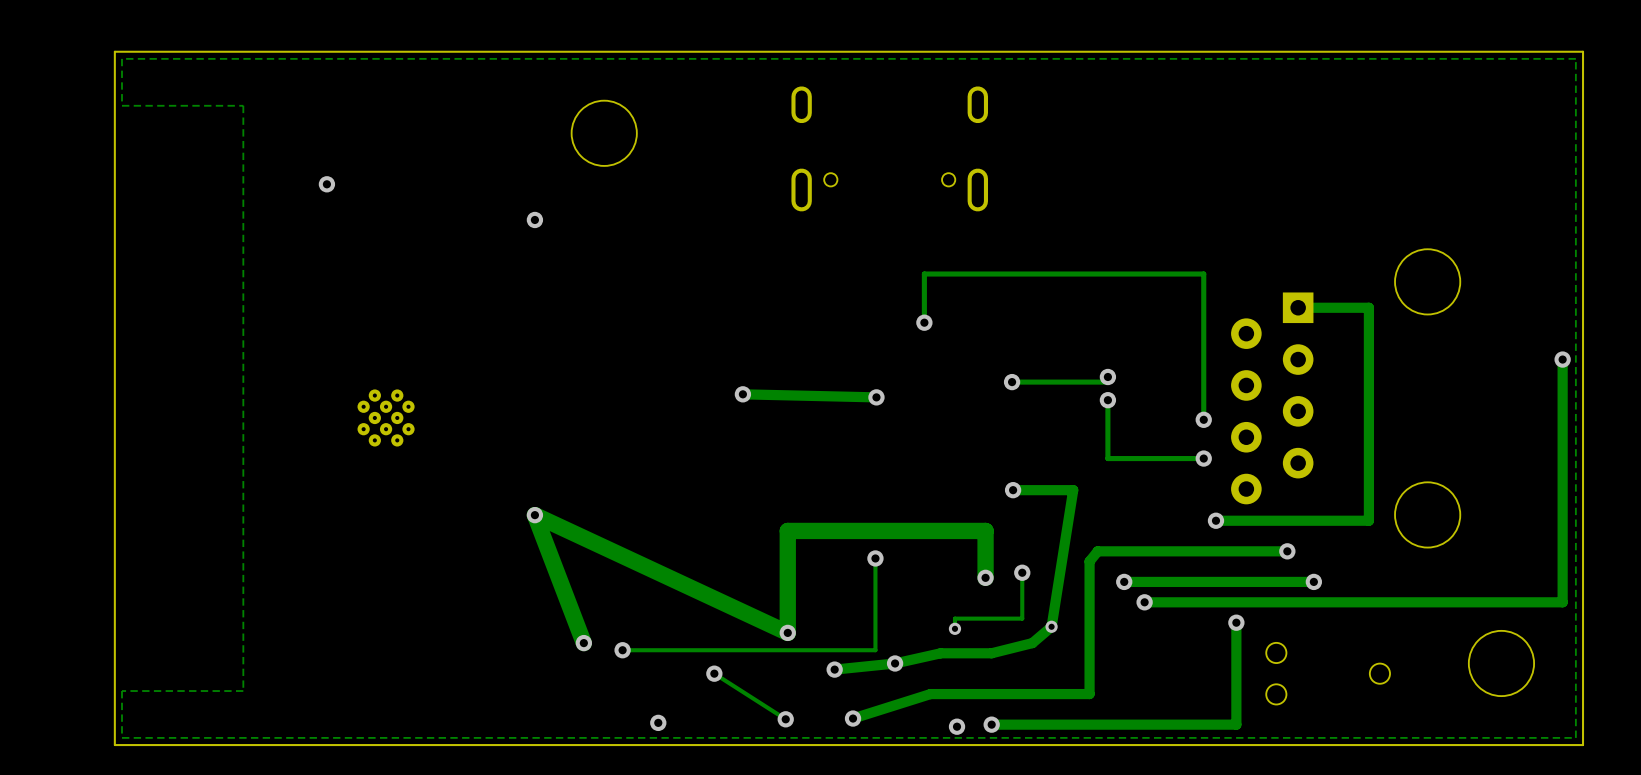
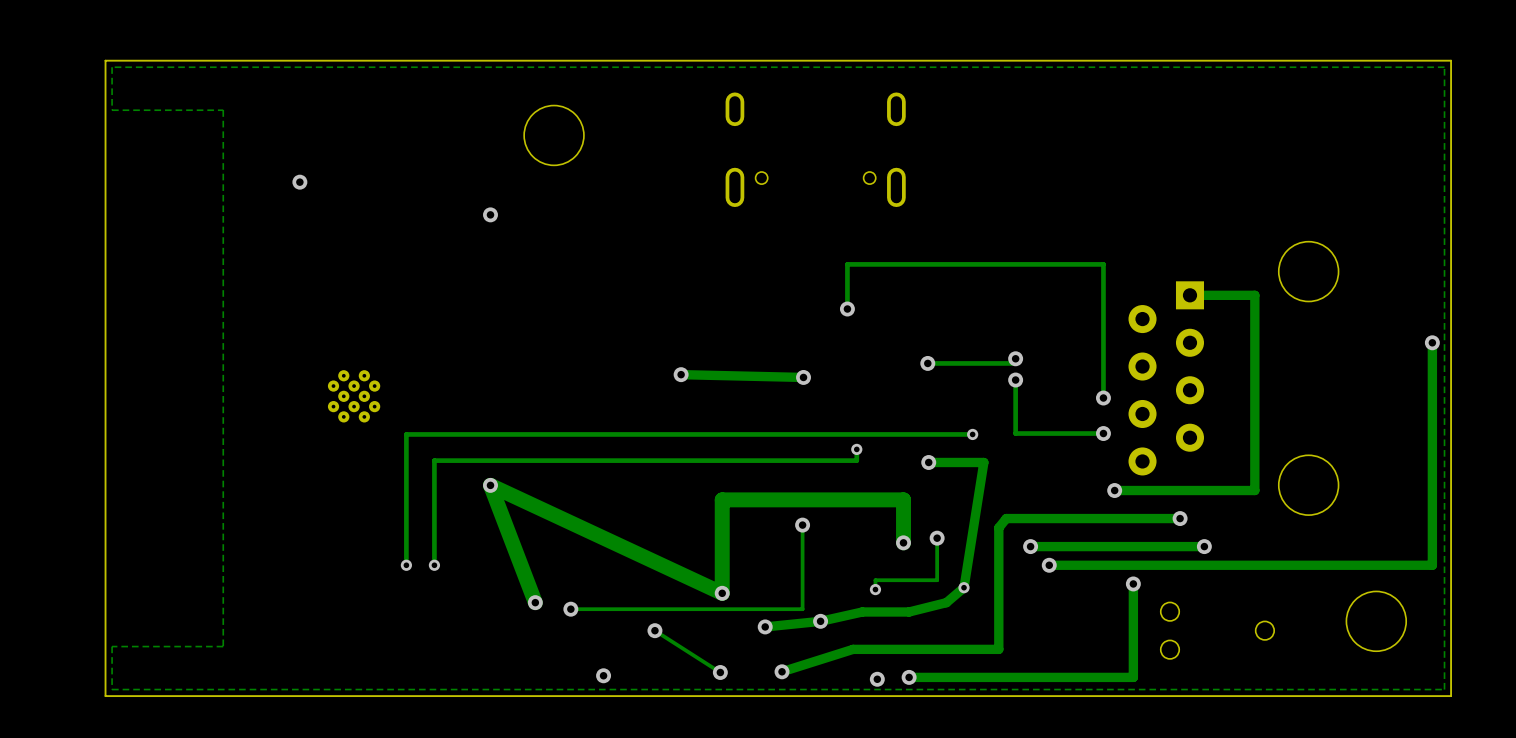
track: none -> (972, 434) (406, 434) (406, 565)
via: none -> (972, 434)
track: none -> (856, 449) (856, 460) (434, 460) (434, 565)
via: none -> (856, 449)
via: none -> (406, 565)
via: none -> (434, 565)

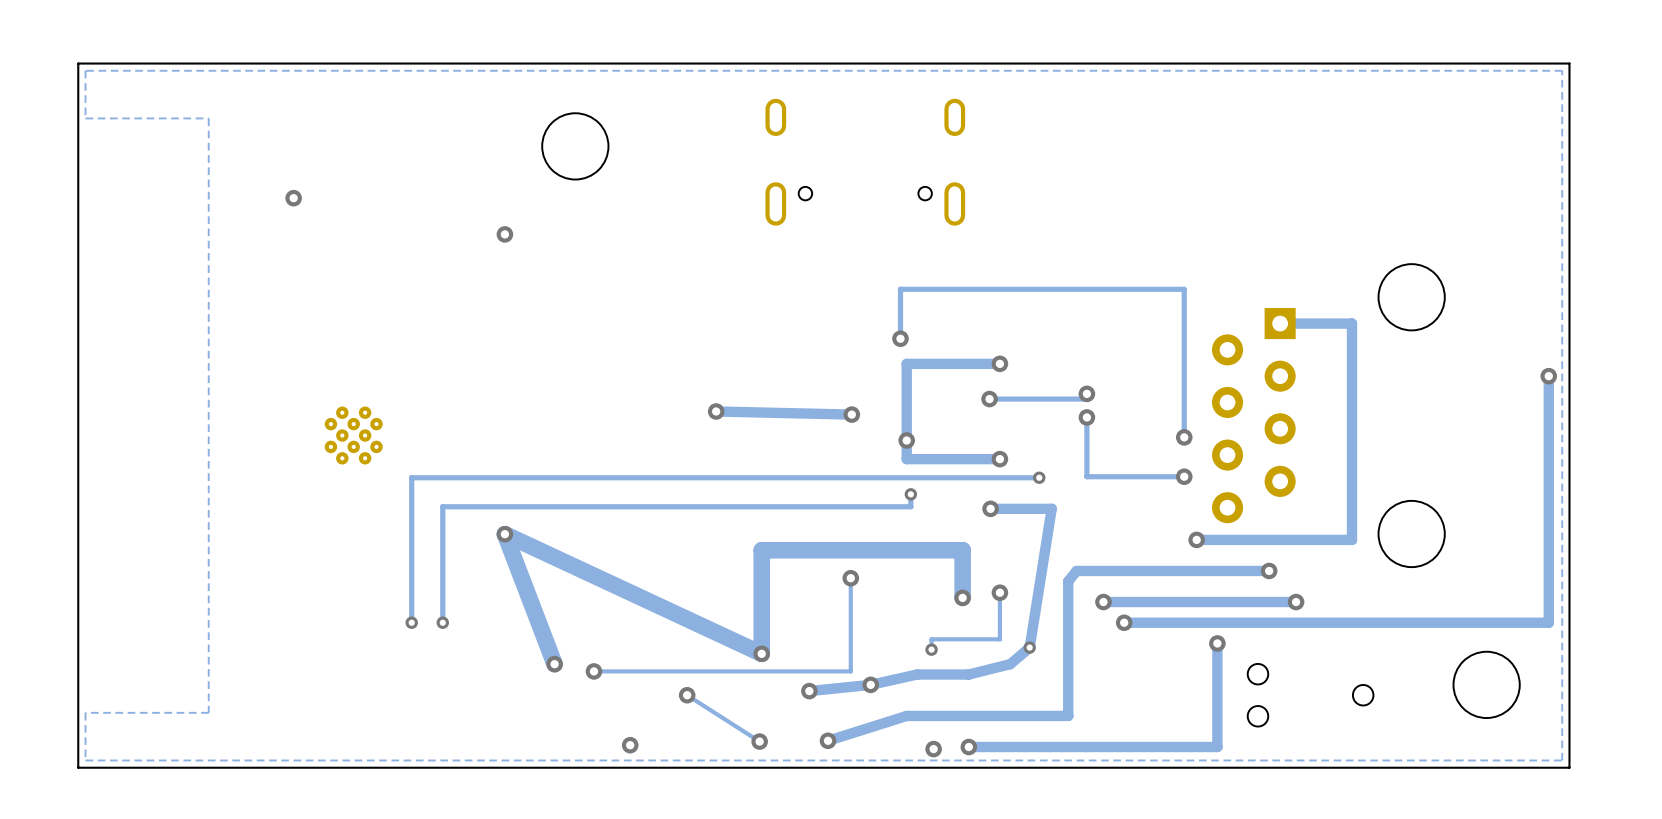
track: none -> (999, 363) (906, 363) (906, 459) (999, 459)
via: none -> (999, 363)
via: none -> (906, 440)
via: none -> (999, 459)

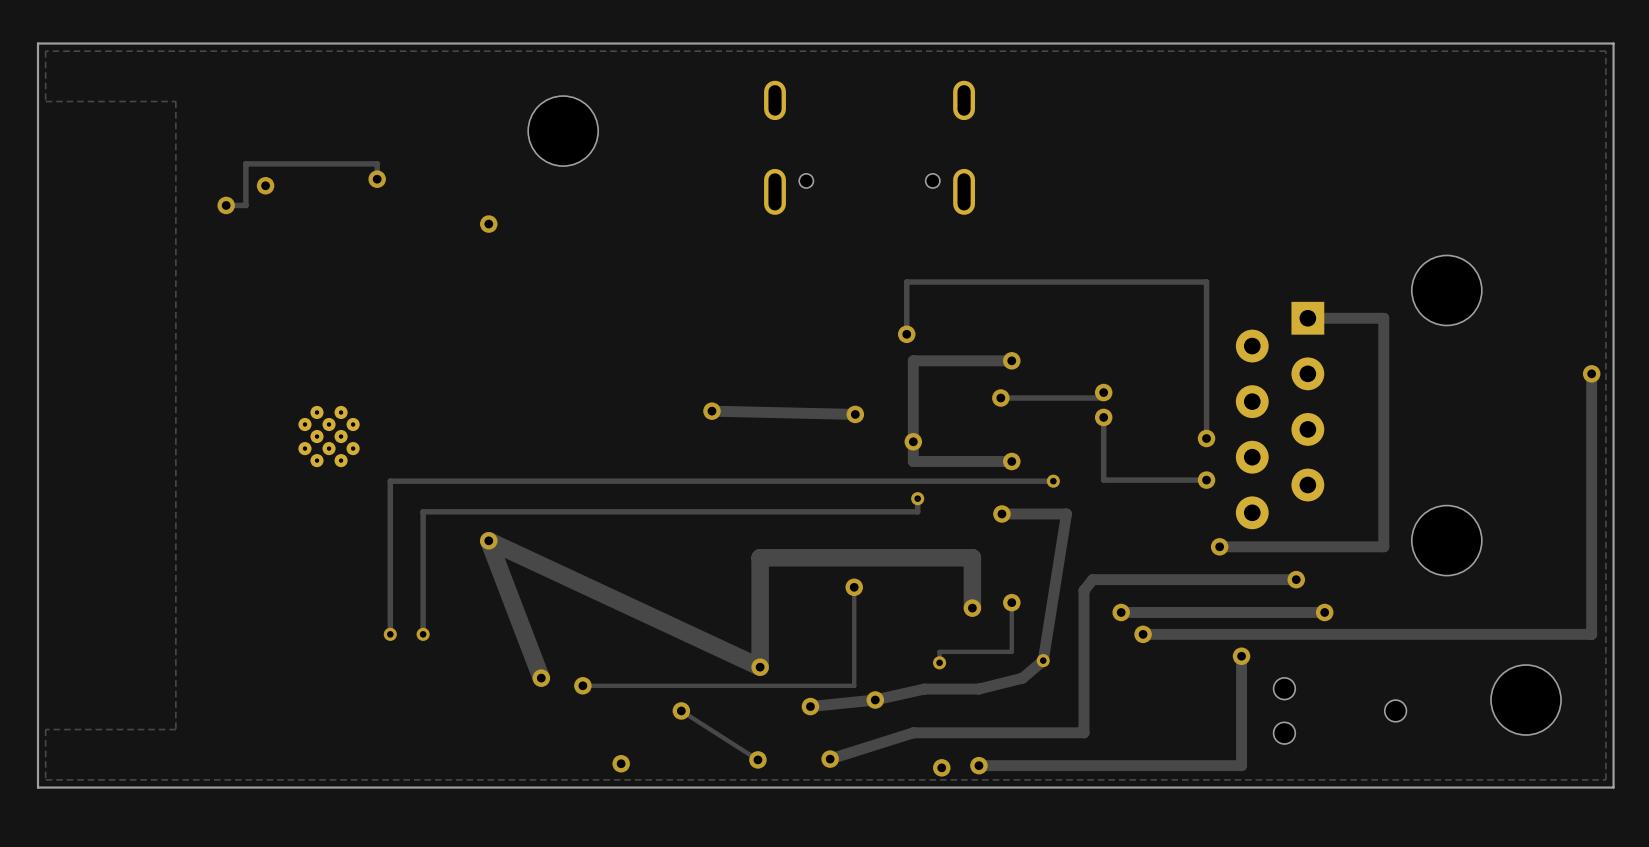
track: none -> (377, 179) (377, 163) (245, 163) (245, 205) (226, 205)
via: none -> (377, 179)
via: none -> (226, 205)

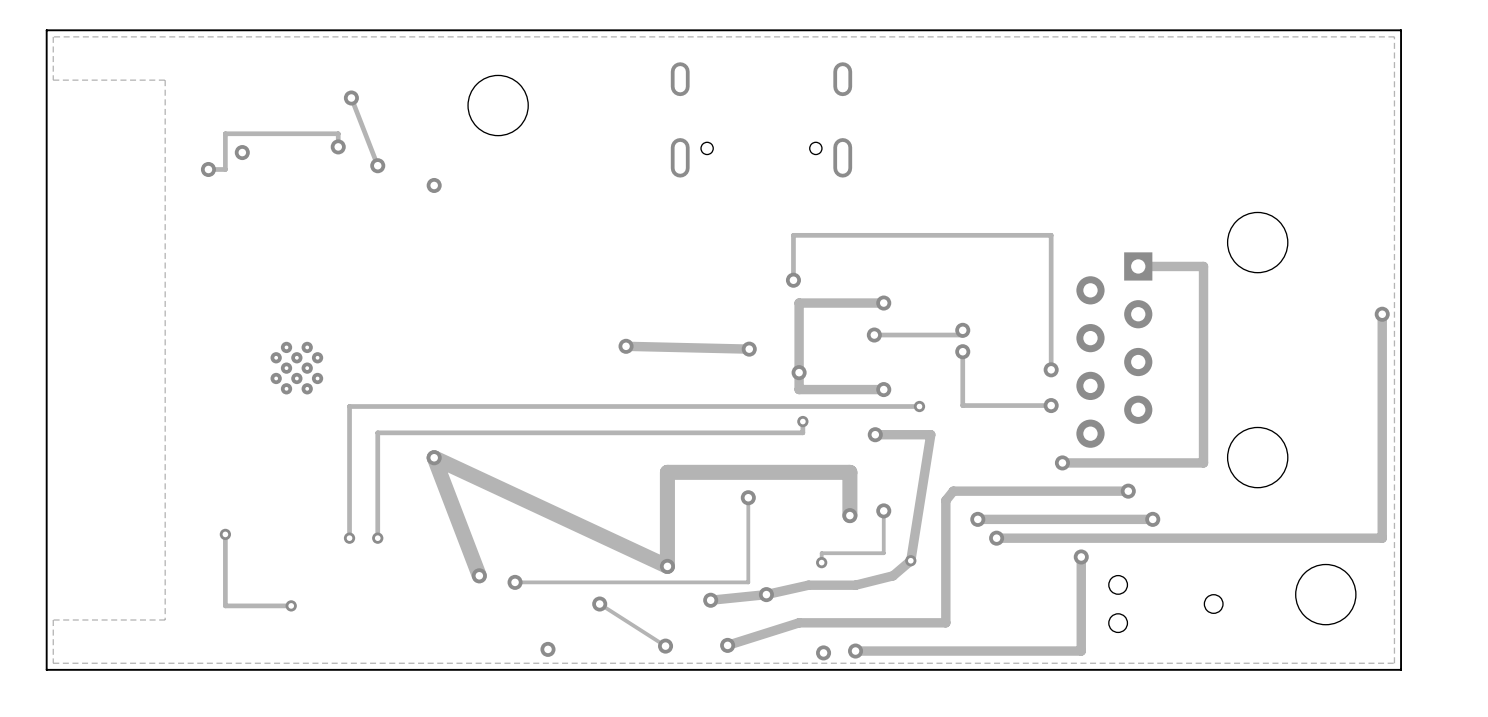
track: none -> (351, 98) (377, 165)
via: none -> (351, 98)
via: none -> (377, 165)
track: none -> (225, 534) (225, 605) (291, 605)
via: none -> (225, 534)
via: none -> (291, 605)

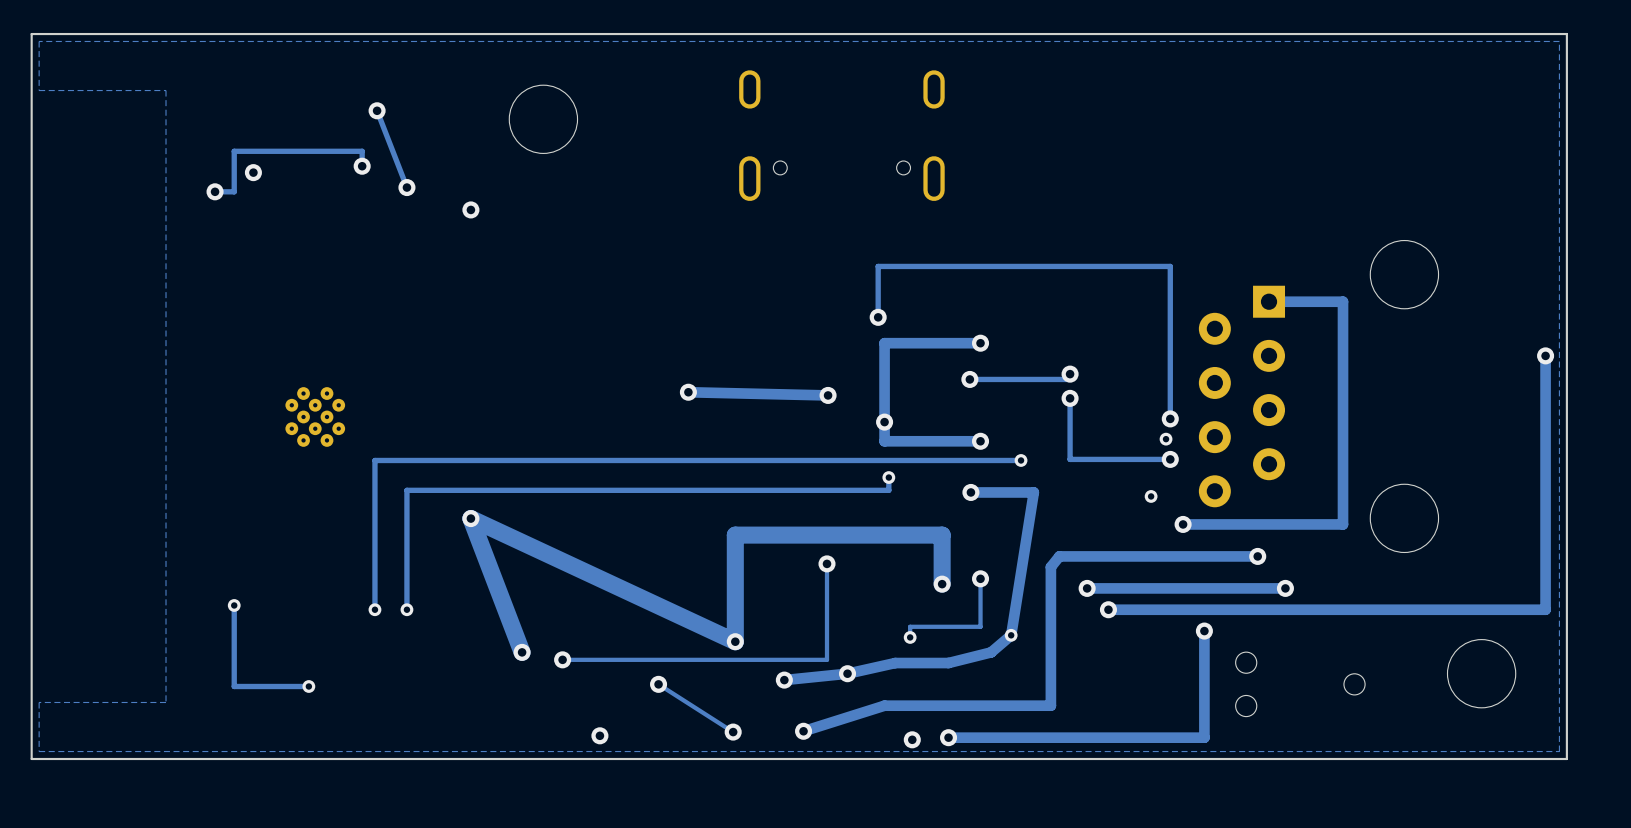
via: none -> (1166, 439)
via: none -> (1151, 496)

